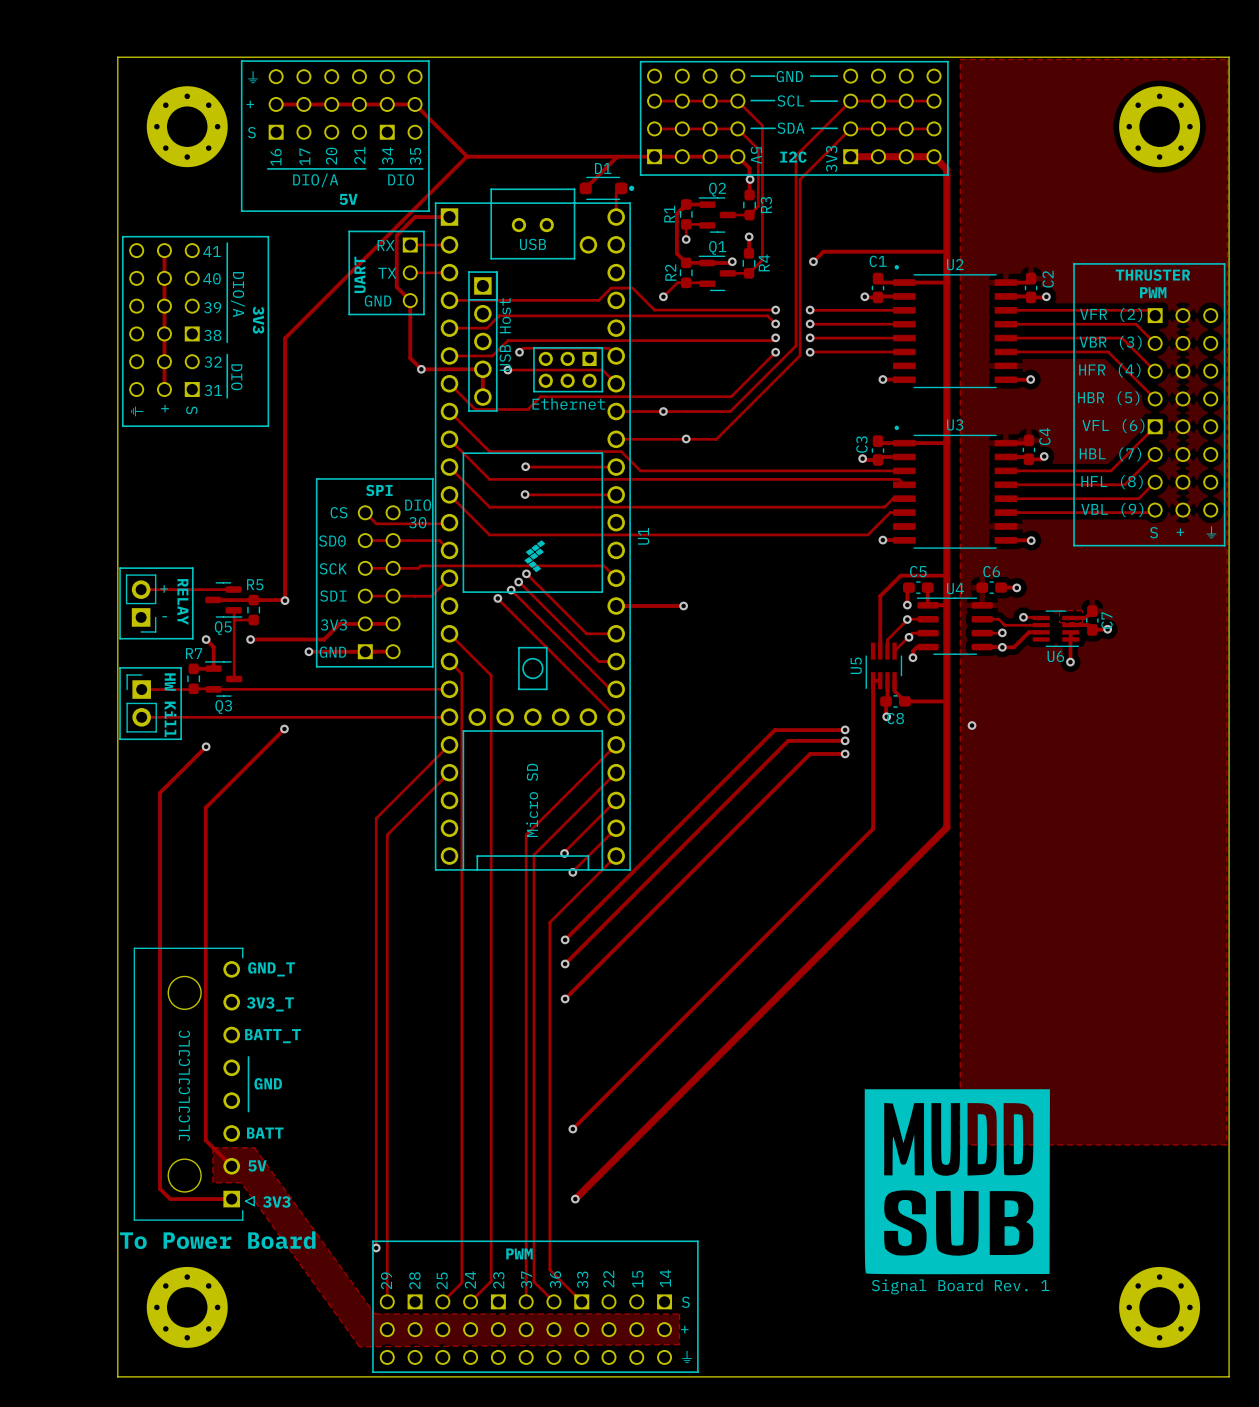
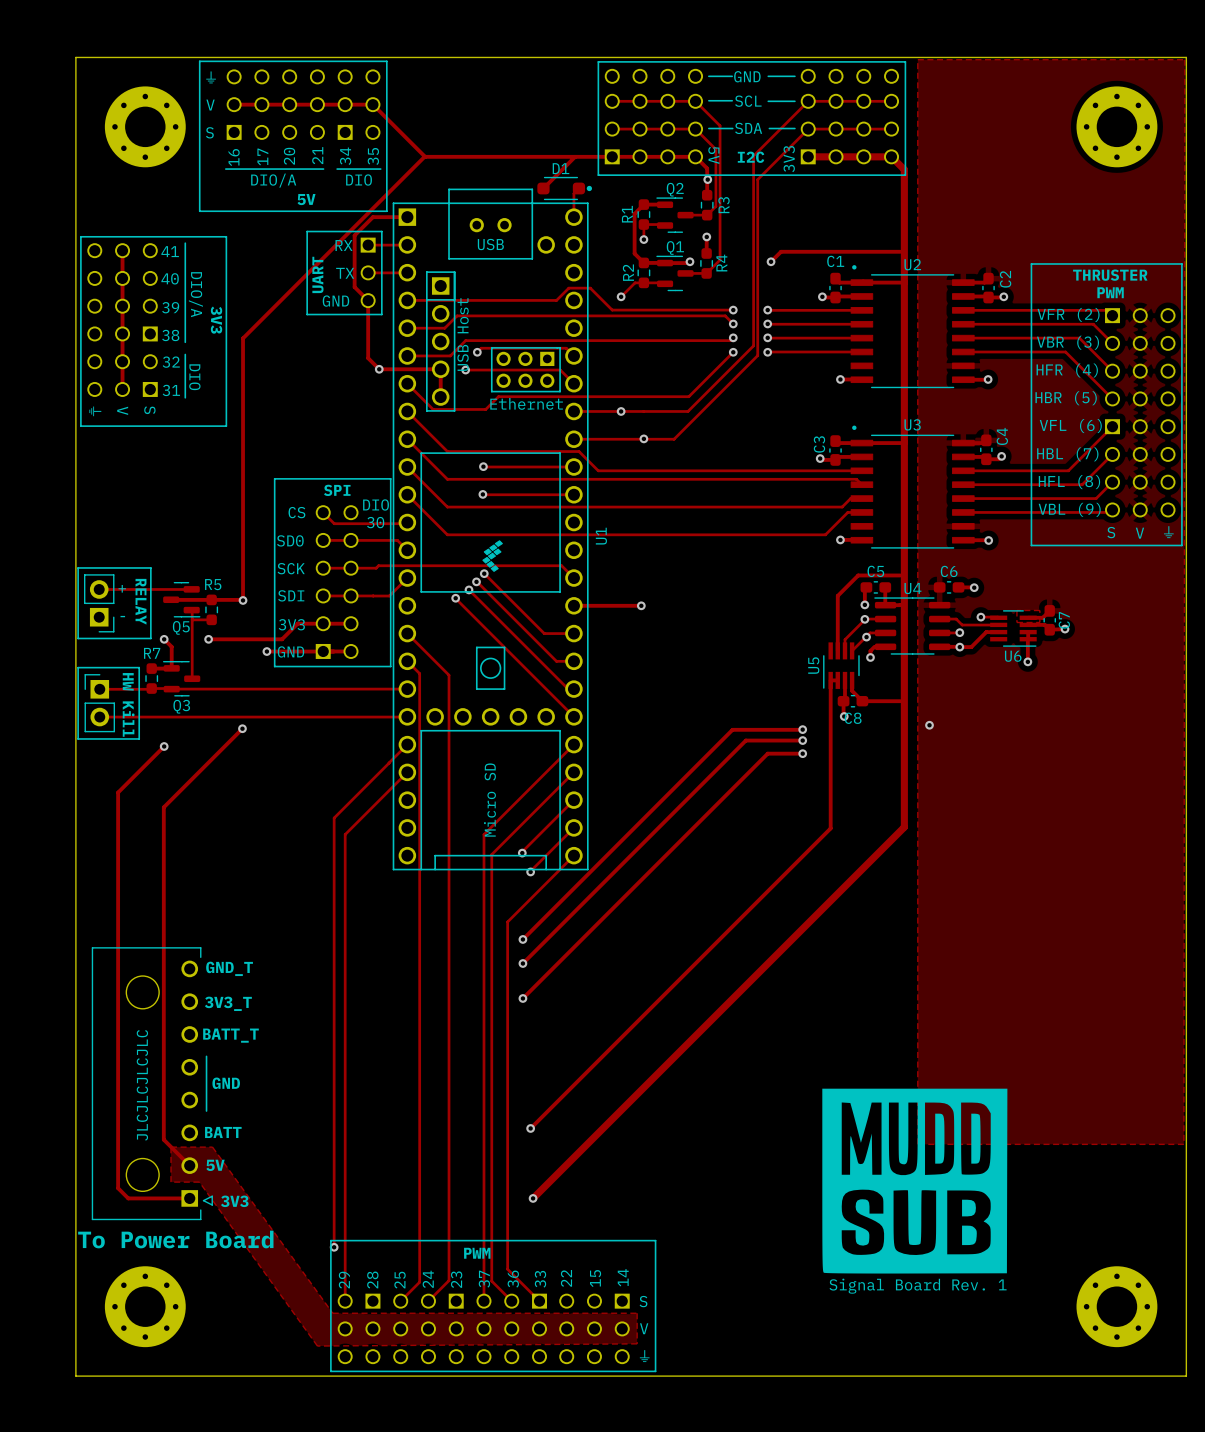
text: + (250, 104) -> V (210, 105)
text: + (165, 408) -> V (122, 410)
text: + (1180, 532) -> V (1139, 533)
text: + (684, 1329) -> V (644, 1328)

